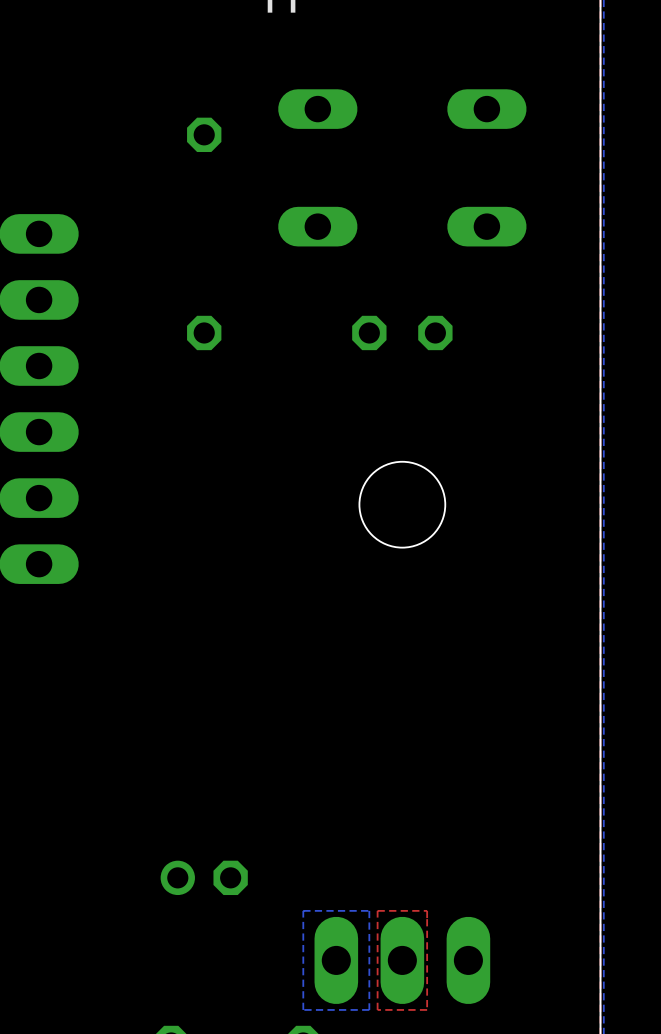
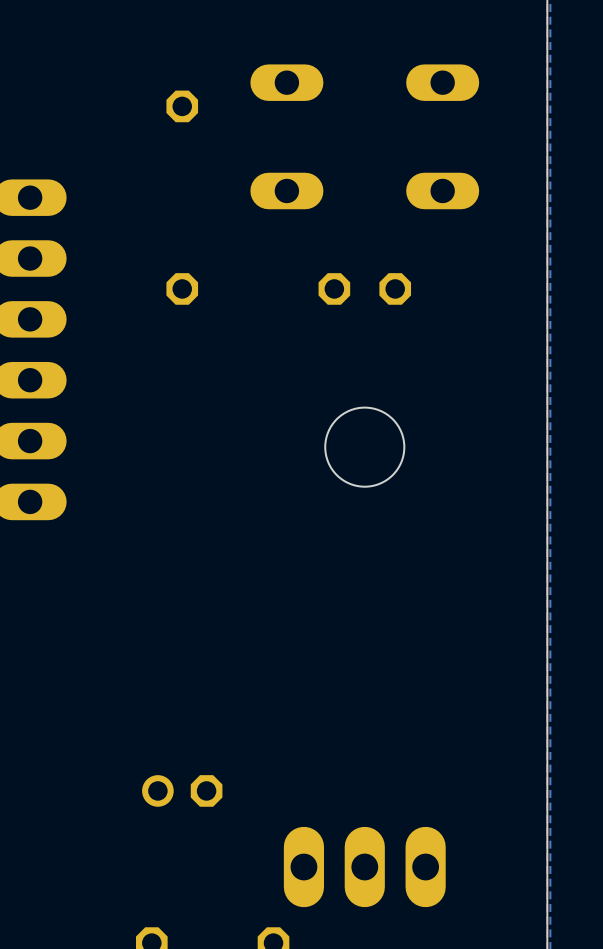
bottom zone outline: (369, 910) (369, 1009) (303, 1009) (303, 910) (369, 910) -> none
top zone outline: (427, 910) (427, 1009) (377, 1009) (377, 910) (427, 910) -> none

